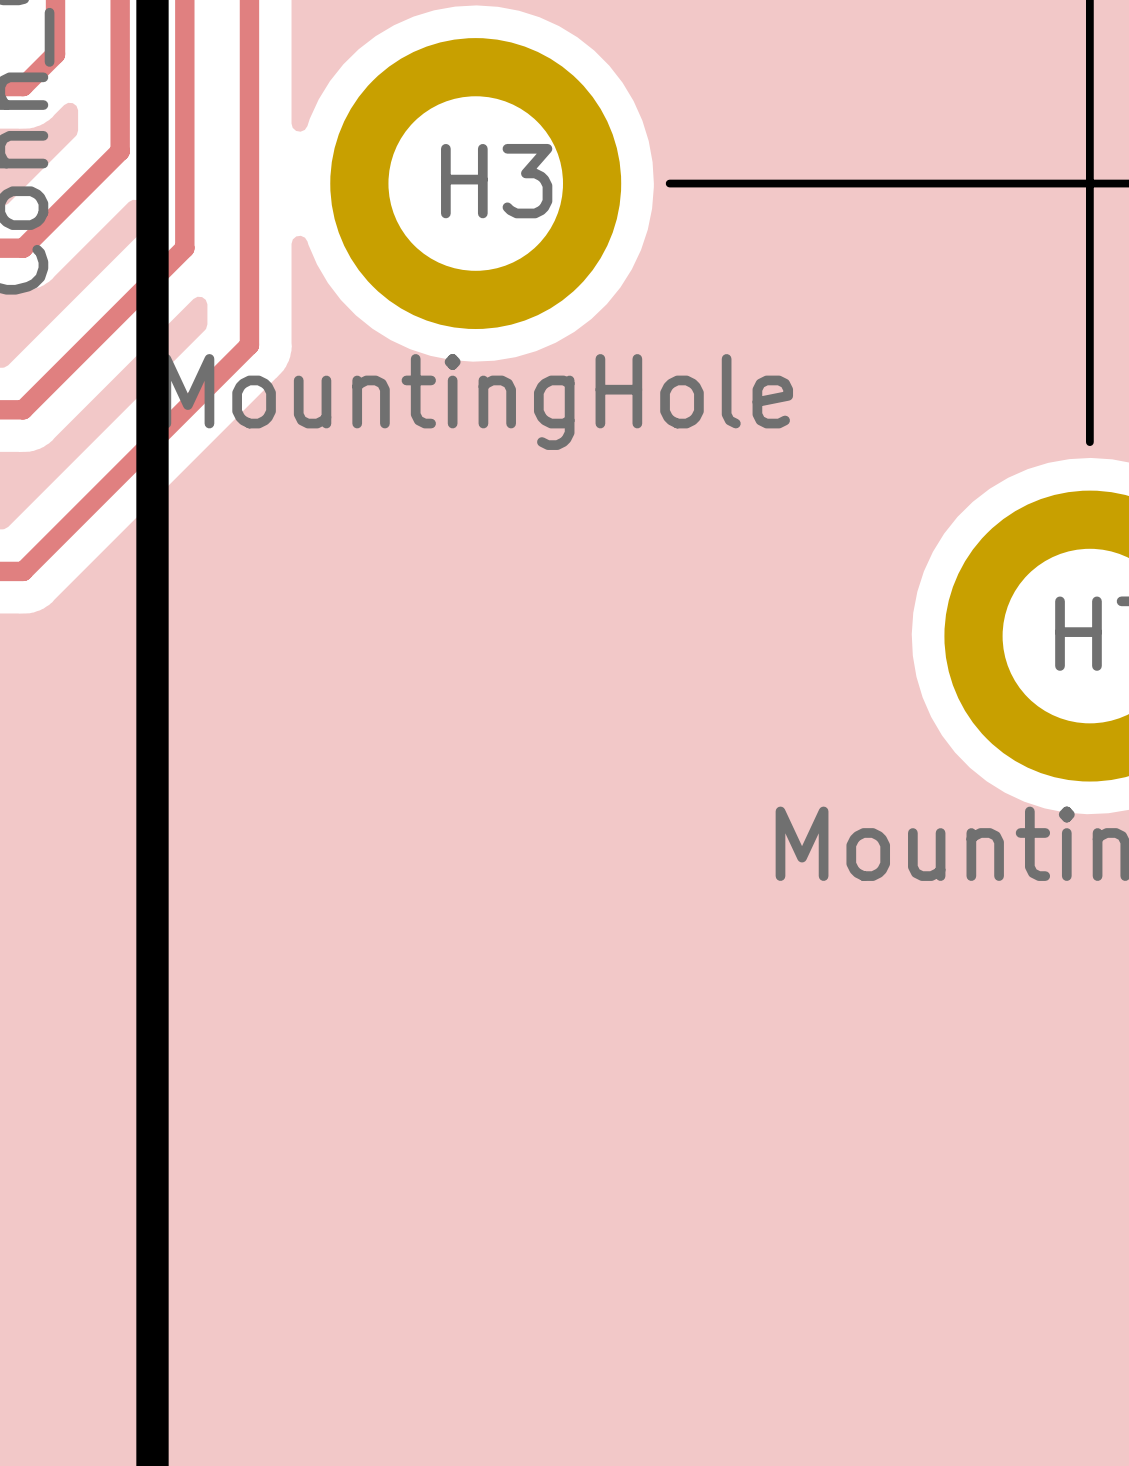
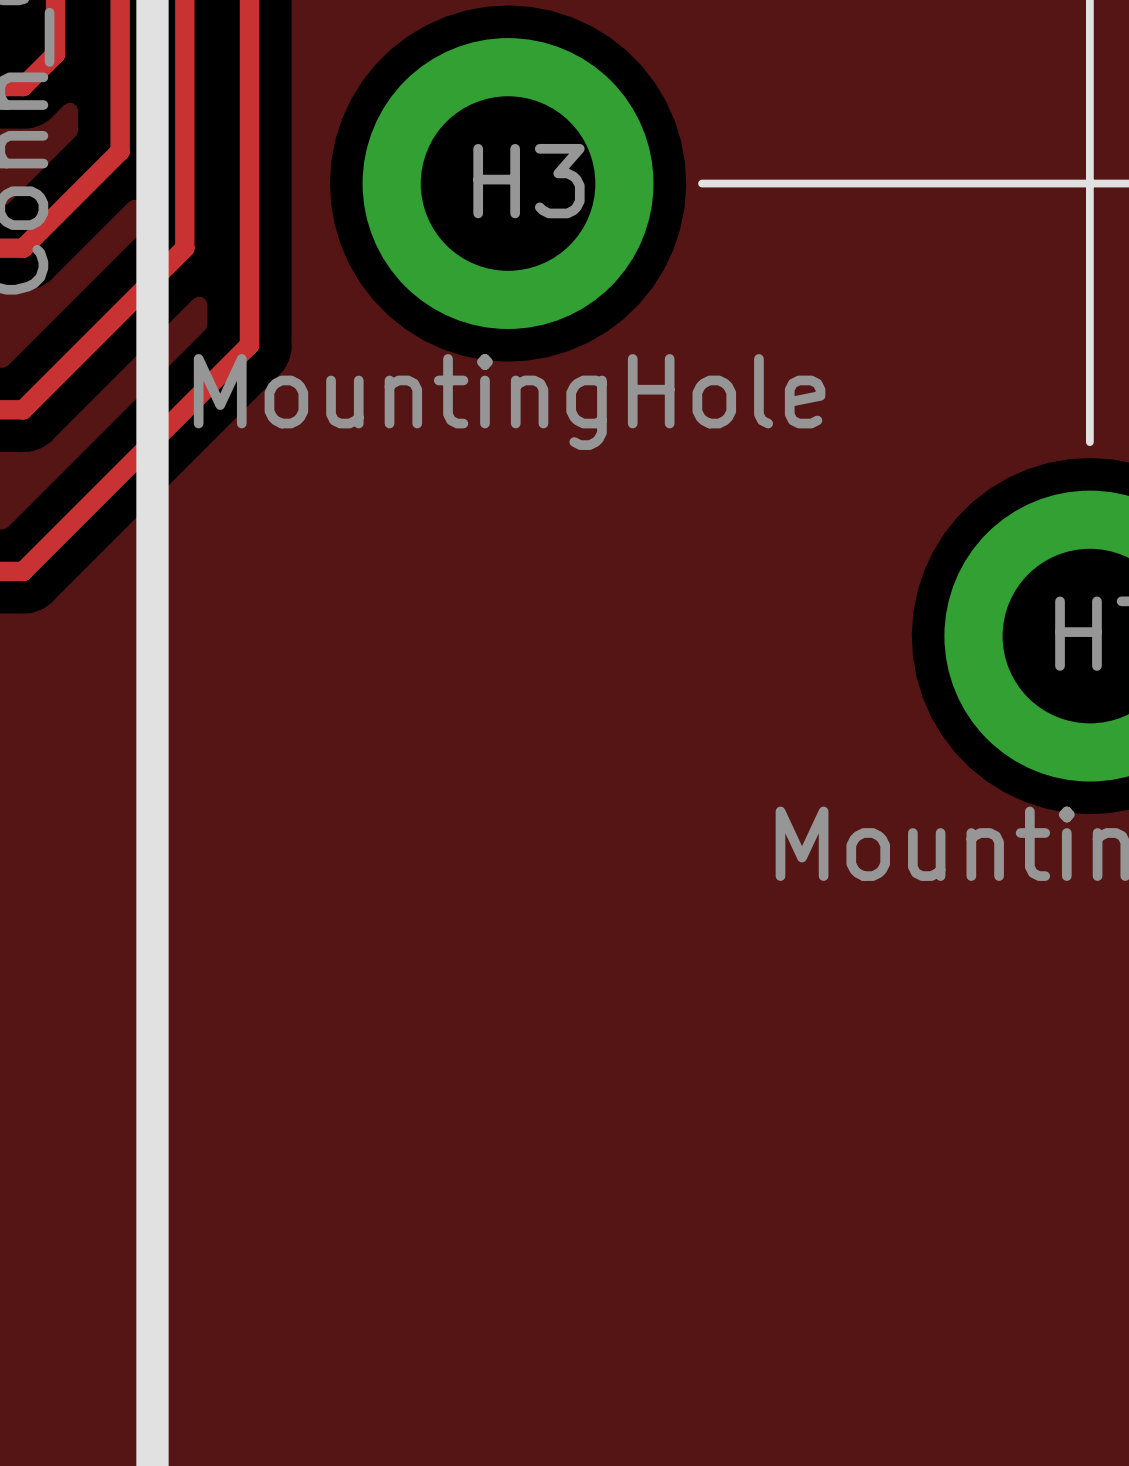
H3 position: (475, 183) -> (508, 183)
line: (669, 183) (701, 183) -> none

